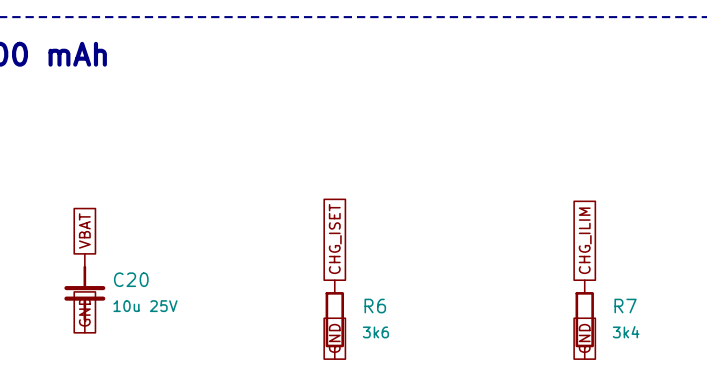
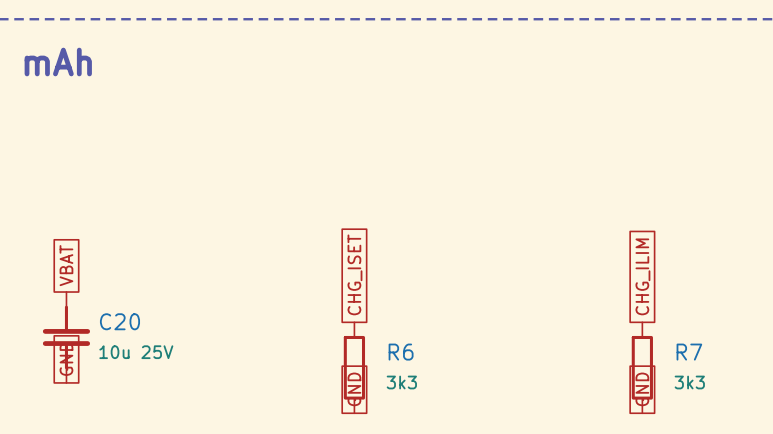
R6 value: 3k6 (375, 332) -> 3k3 (401, 382)
R7 value: 3k4 (626, 332) -> 3k3 (689, 382)

